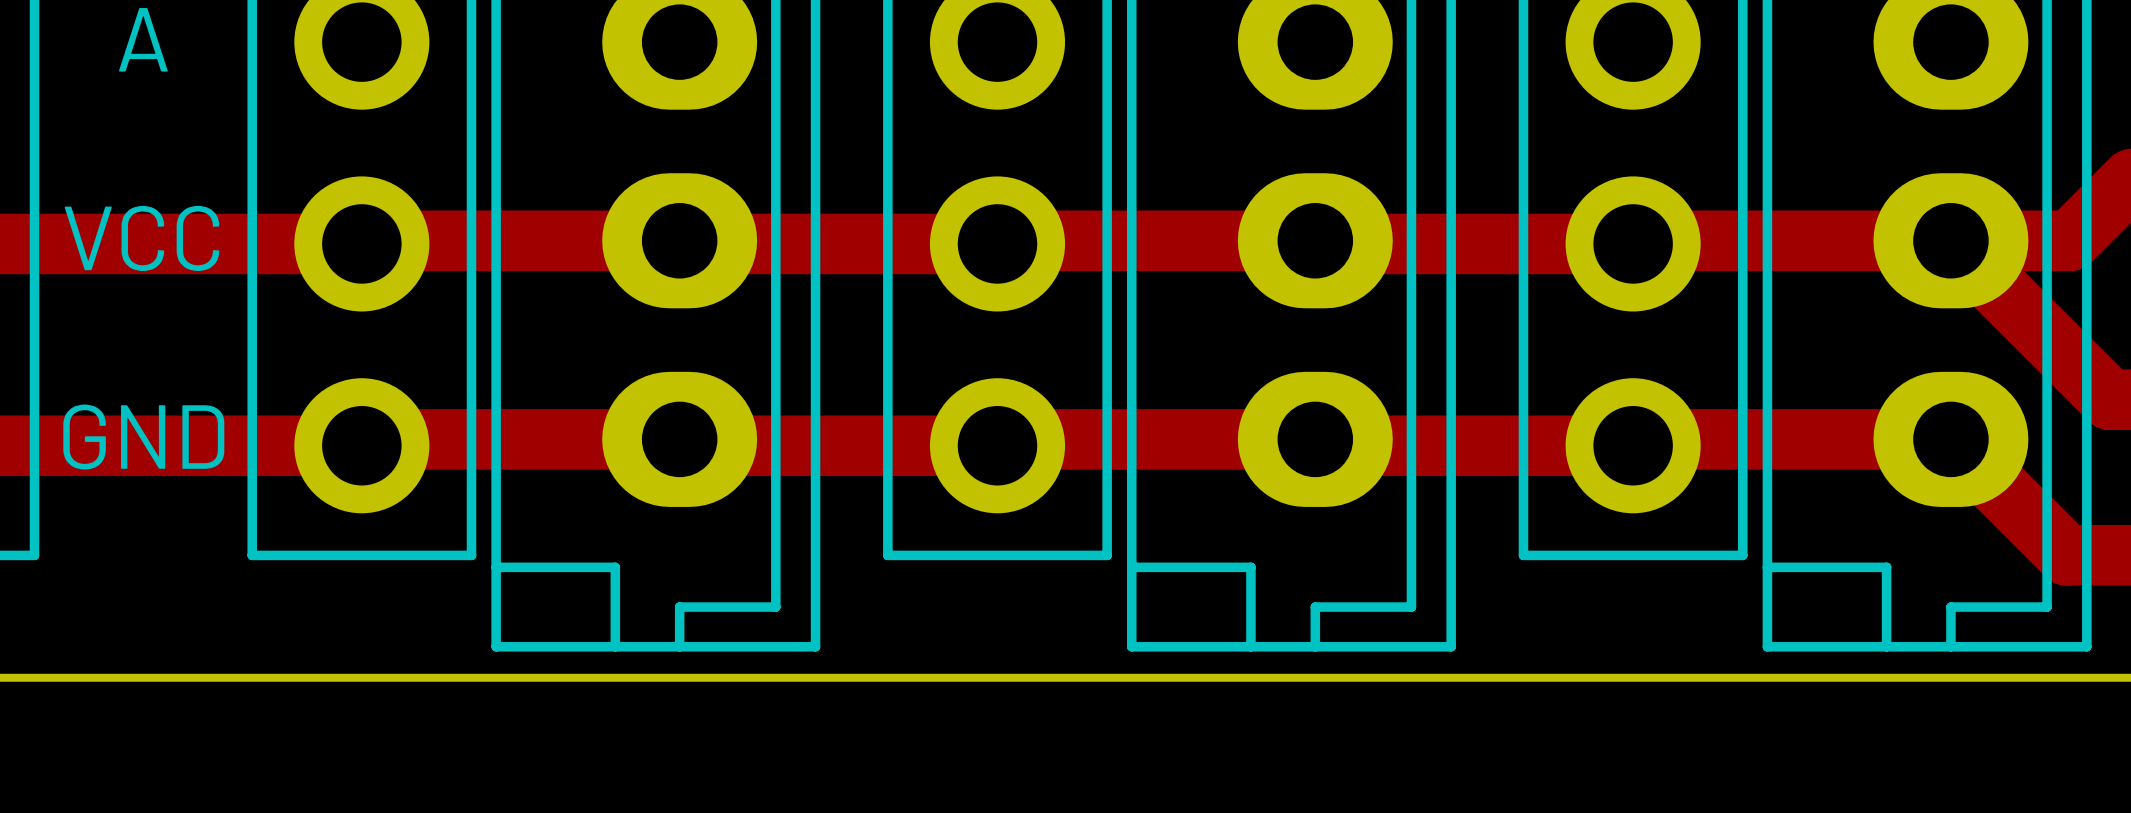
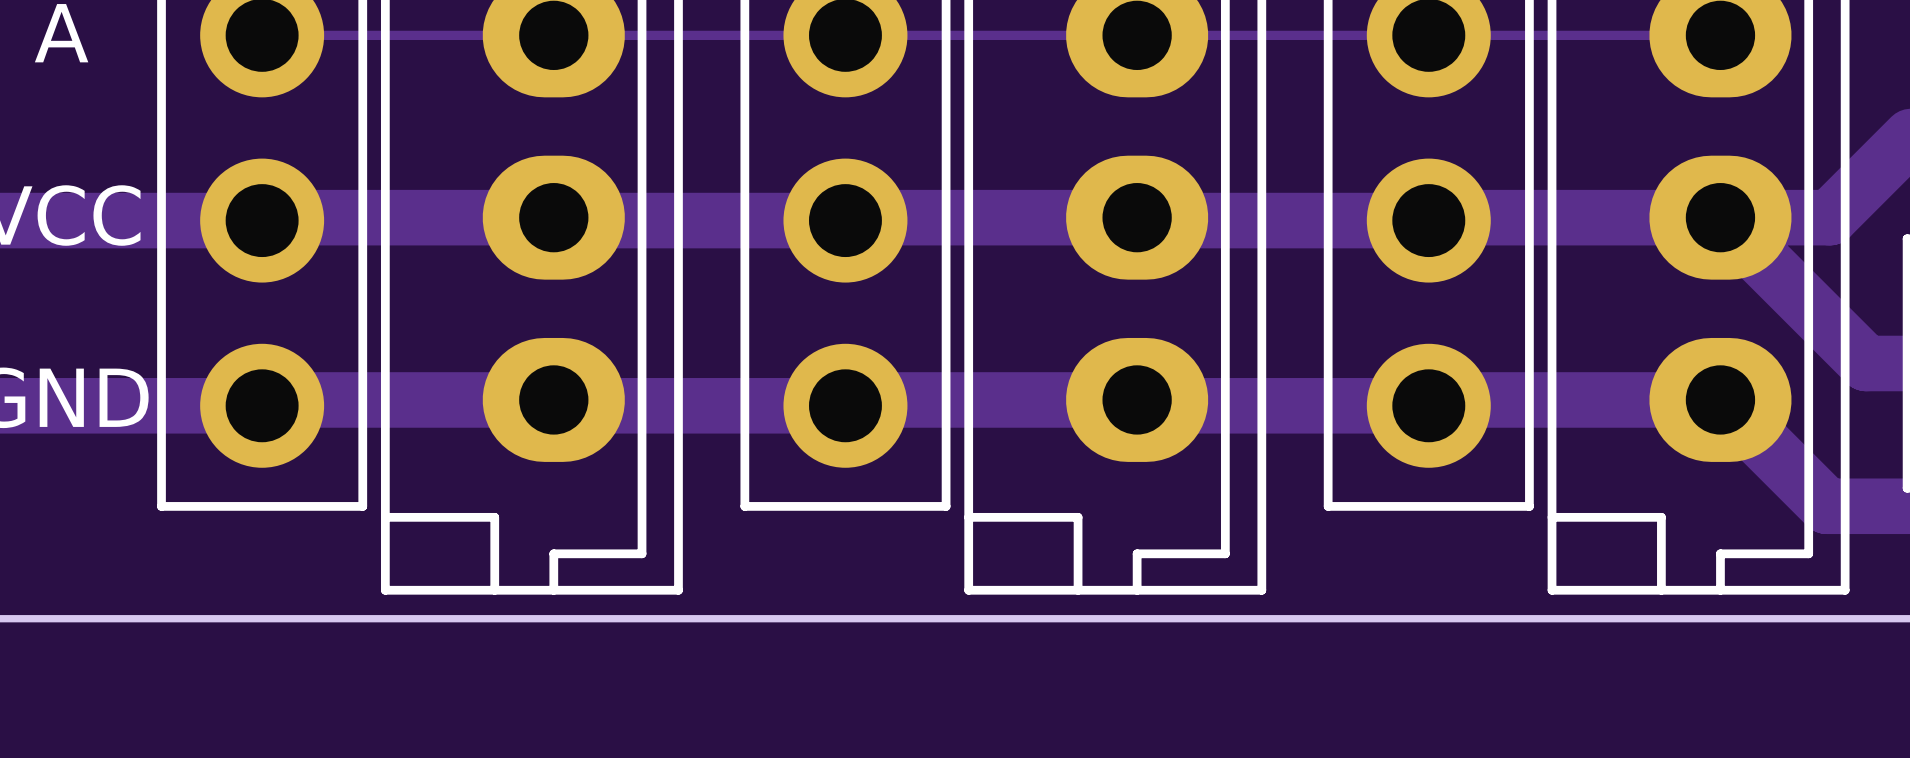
track: none -> (262, 35) (1720, 35)

